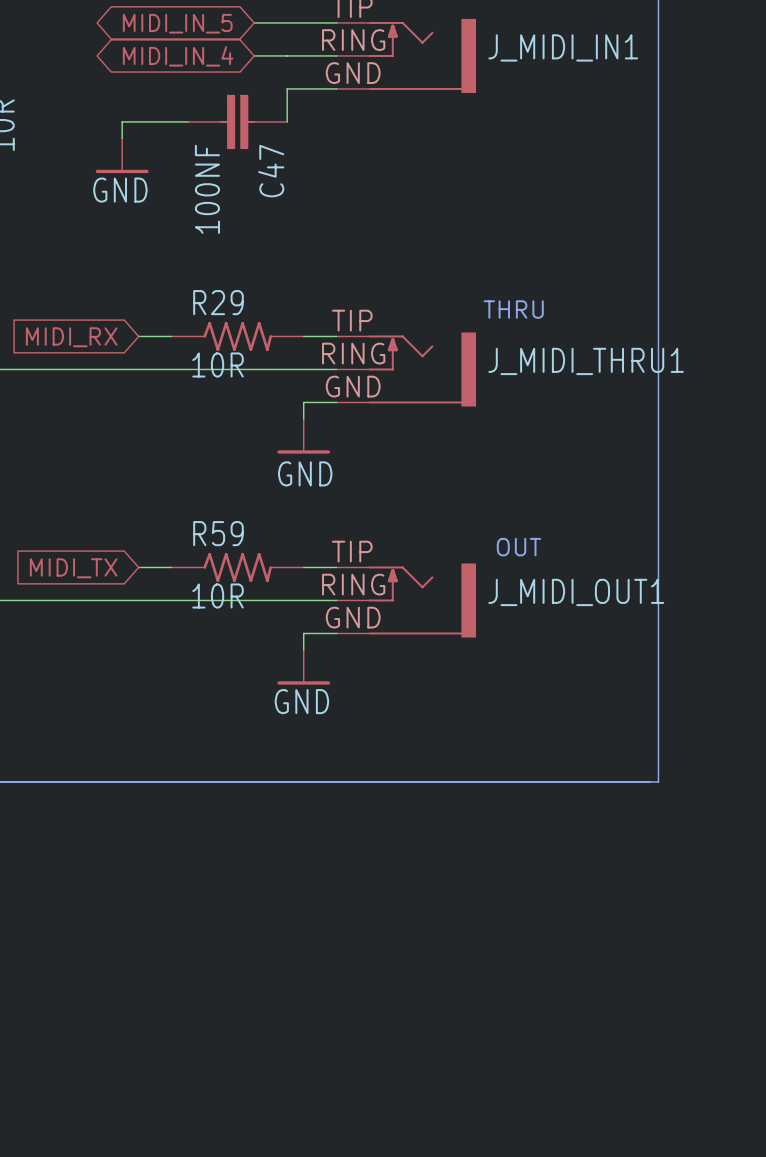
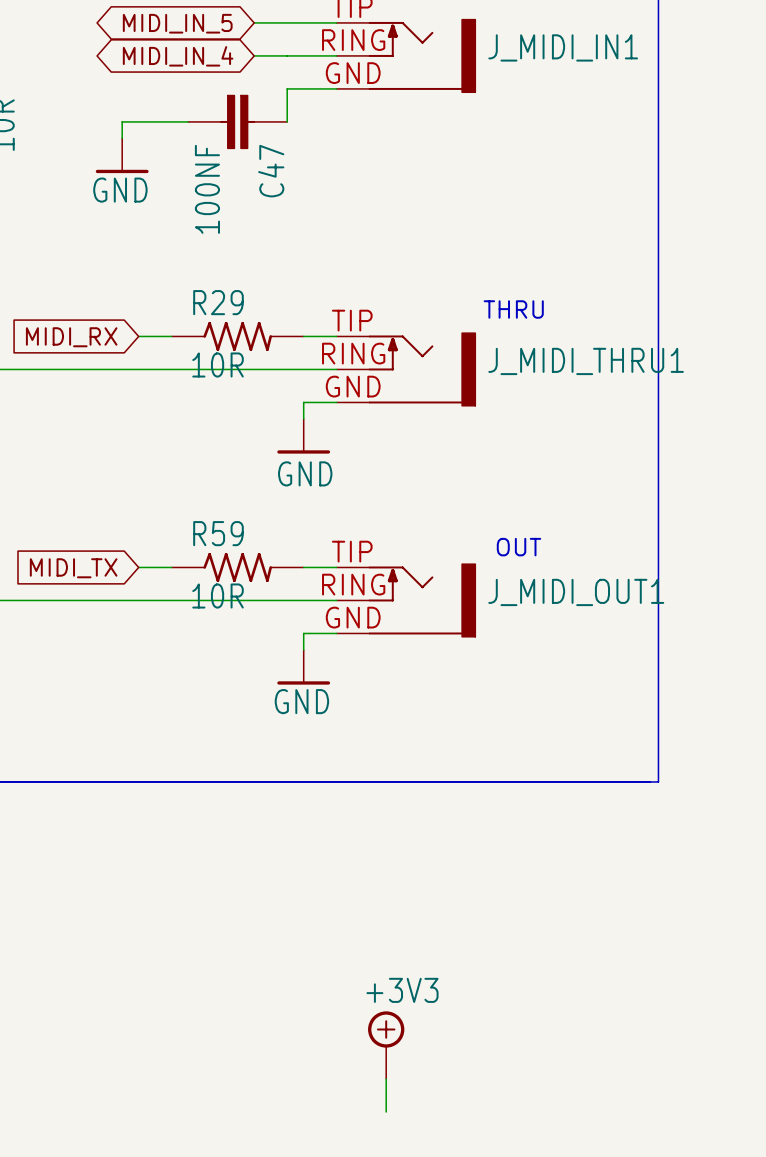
power symbol: none -> +3V3 (386, 1045)
wire: none -> (386, 1078) (386, 1111)

